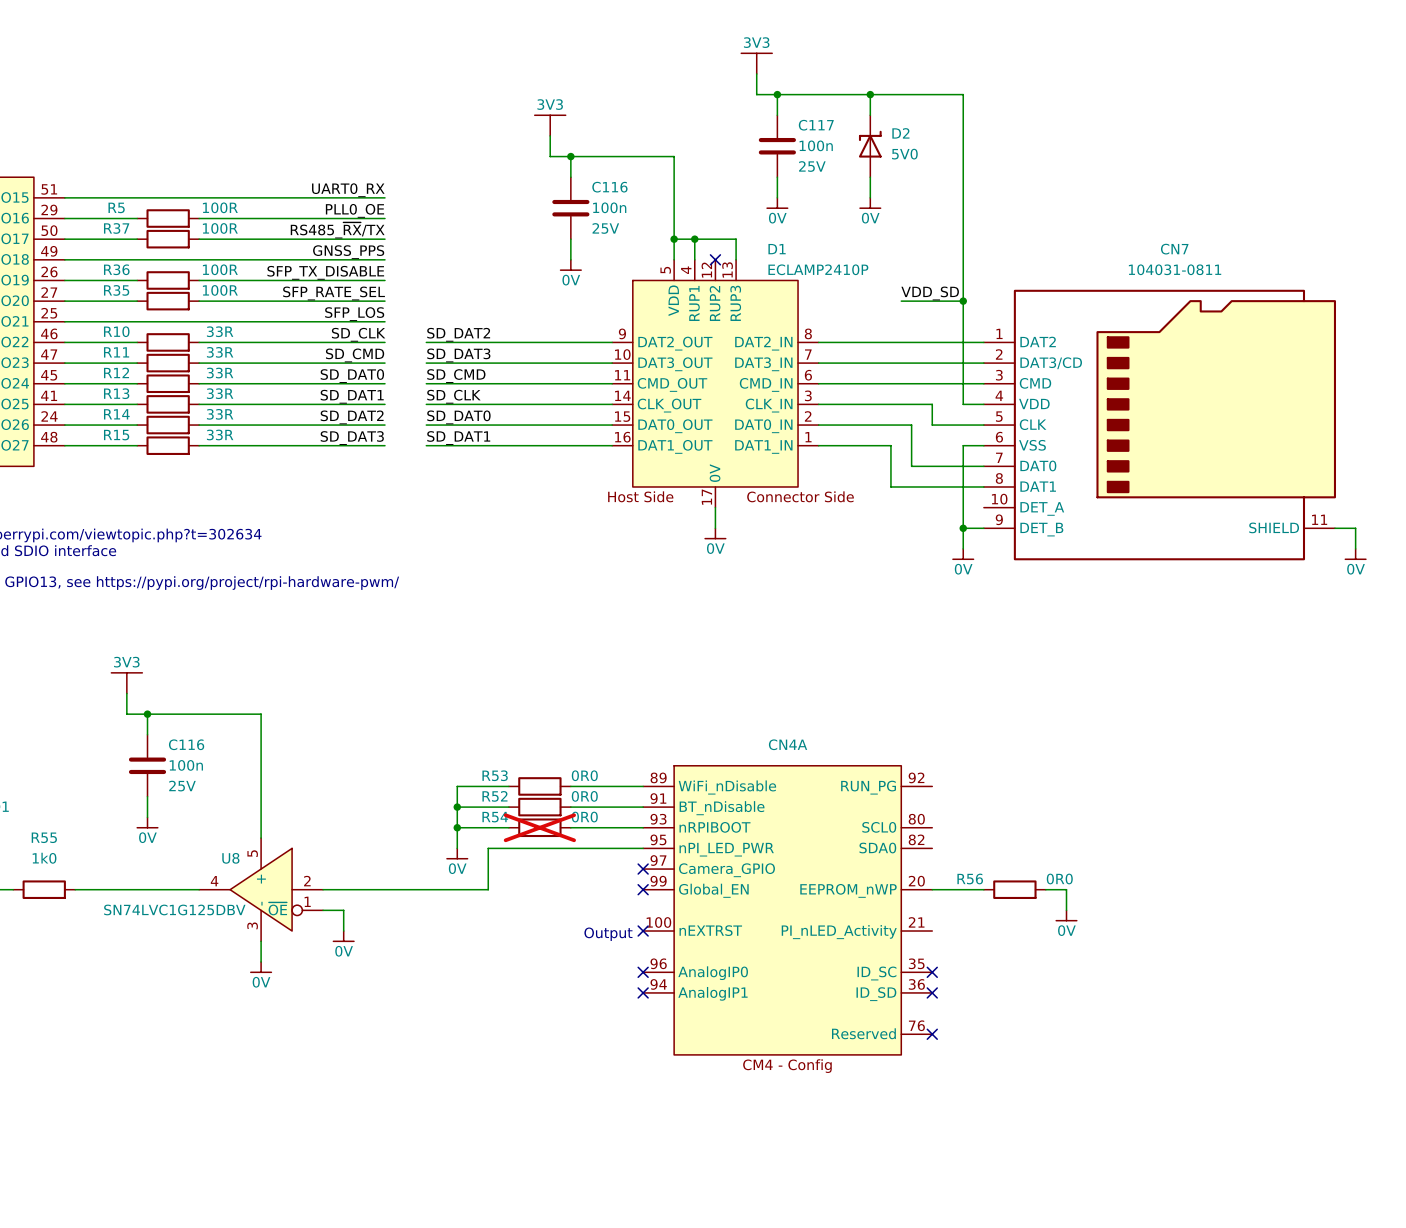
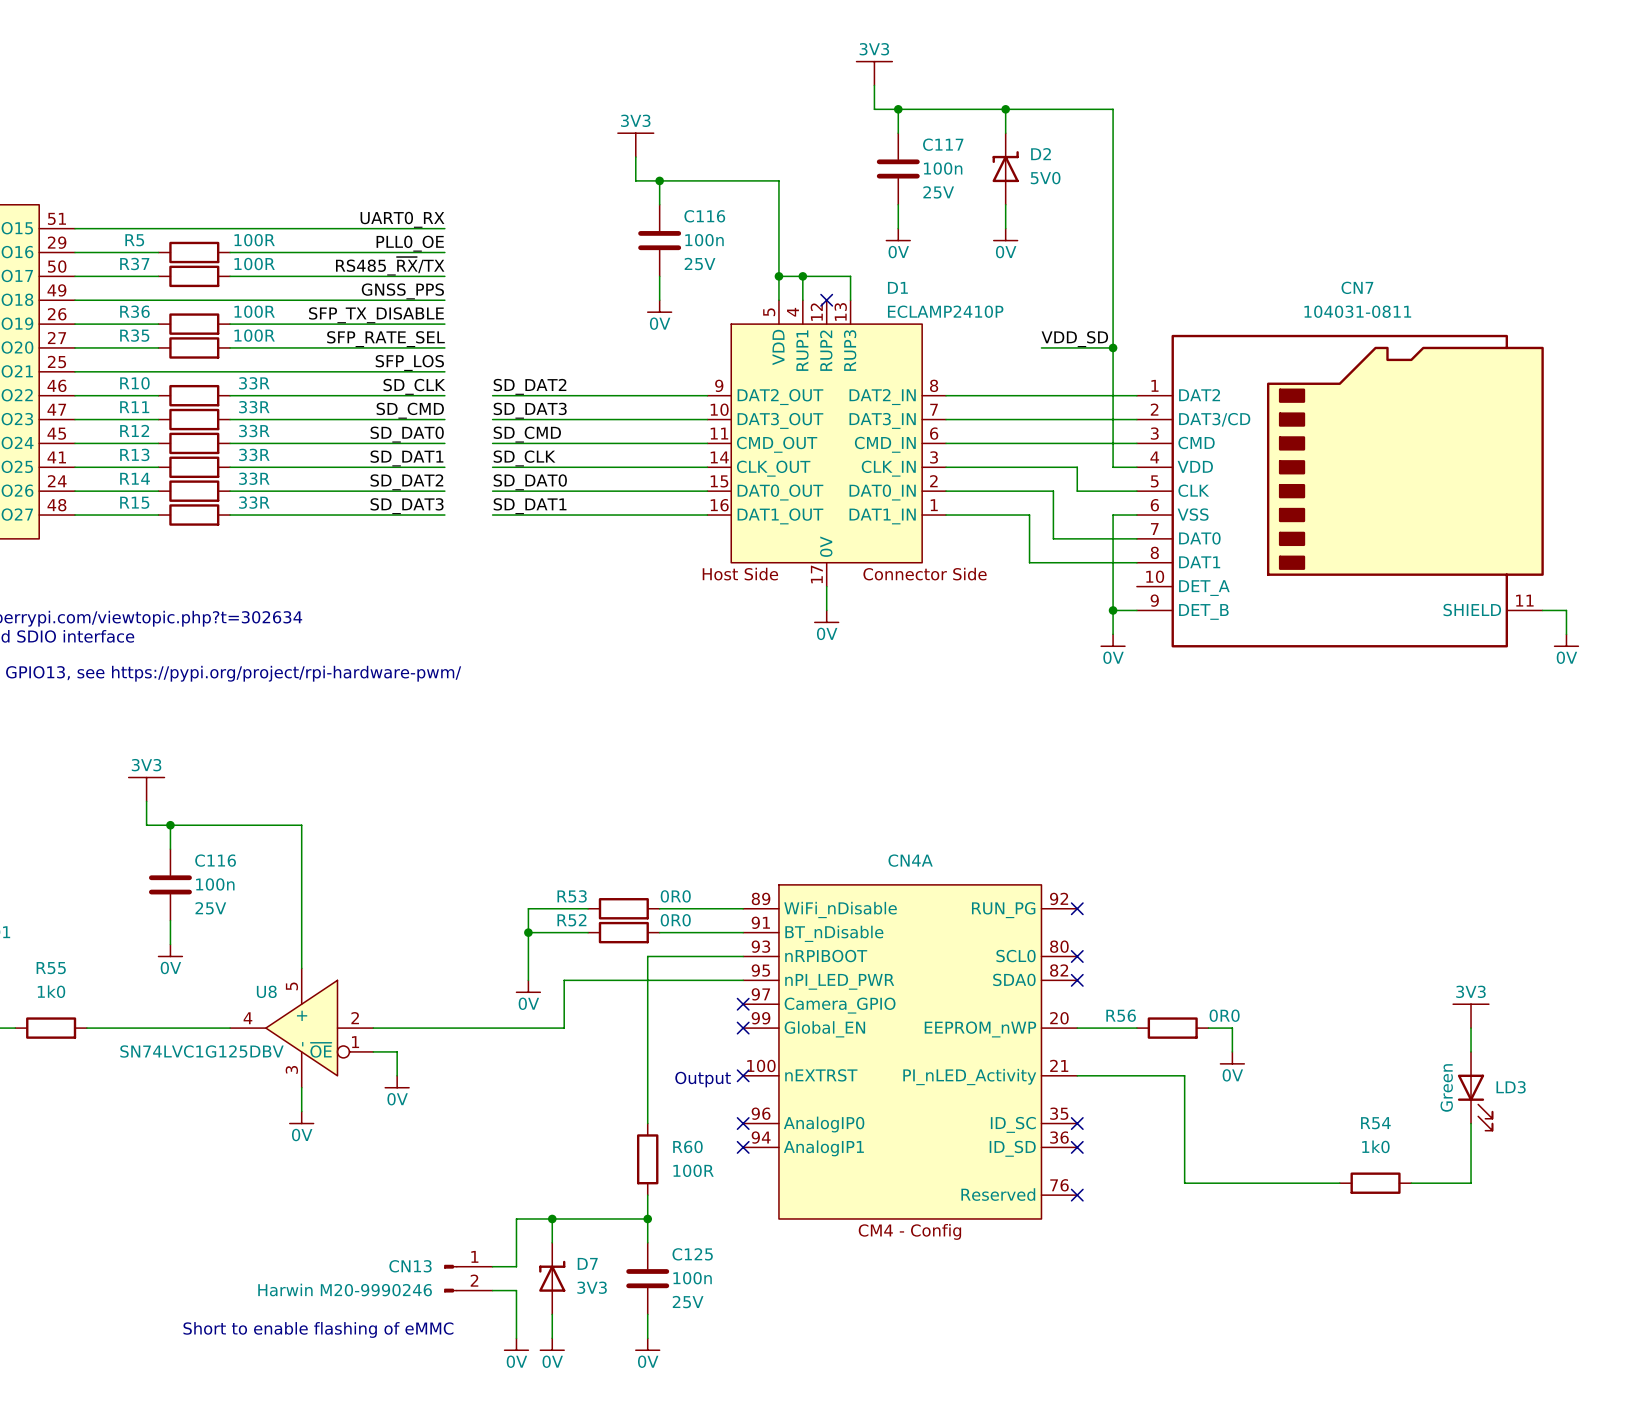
no-connect mark: none -> (1077, 908)
R54 name position: R54 (495, 817) -> R54 (1375, 1123)
R54 value: 0R0 (584, 817) -> 1k0 (1375, 1146)
wire: (457, 827) (508, 827) -> none
junction: (457, 827) -> none
R54 position: (539, 827) -> (1375, 1183)
R54 do-not-place cross: (539, 827) -> none
wire: none -> (659, 956) (647, 956) (647, 1123)
no-connect mark: none -> (1077, 956)
no-connect mark: none -> (1077, 980)
power symbol: none -> 3V3 (1471, 1016)
wire: none -> (1471, 1028) (1471, 1051)
wire: none -> (1077, 1075) (1184, 1075) (1184, 1183) (1339, 1183)
LD3: none -> Green (1475, 1091)
wire: none -> (1471, 1123) (1471, 1183) (1411, 1183)
R60: none -> 100R (647, 1159)
wire: none -> (647, 1195) (647, 1242)
wire: none -> (552, 1218) (552, 1242)
junction: none -> (552, 1218)
wire: none -> (647, 1218) (516, 1218) (516, 1266) (492, 1266)
junction: none -> (647, 1218)
CN13: none -> Harwin M20-9990246 (468, 1278)
D7: none -> 3V3 (552, 1278)
C125: none -> 100n (647, 1278)
wire: none -> (492, 1290) (516, 1290) (516, 1338)
wire: none -> (552, 1314) (552, 1338)
wire: none -> (647, 1314) (647, 1338)
text: none -> Short to enable flashing of eMMC (318, 1329)
power symbol: none -> 0V (516, 1344)
power symbol: none -> 0V (552, 1344)
power symbol: none -> 0V (647, 1344)

